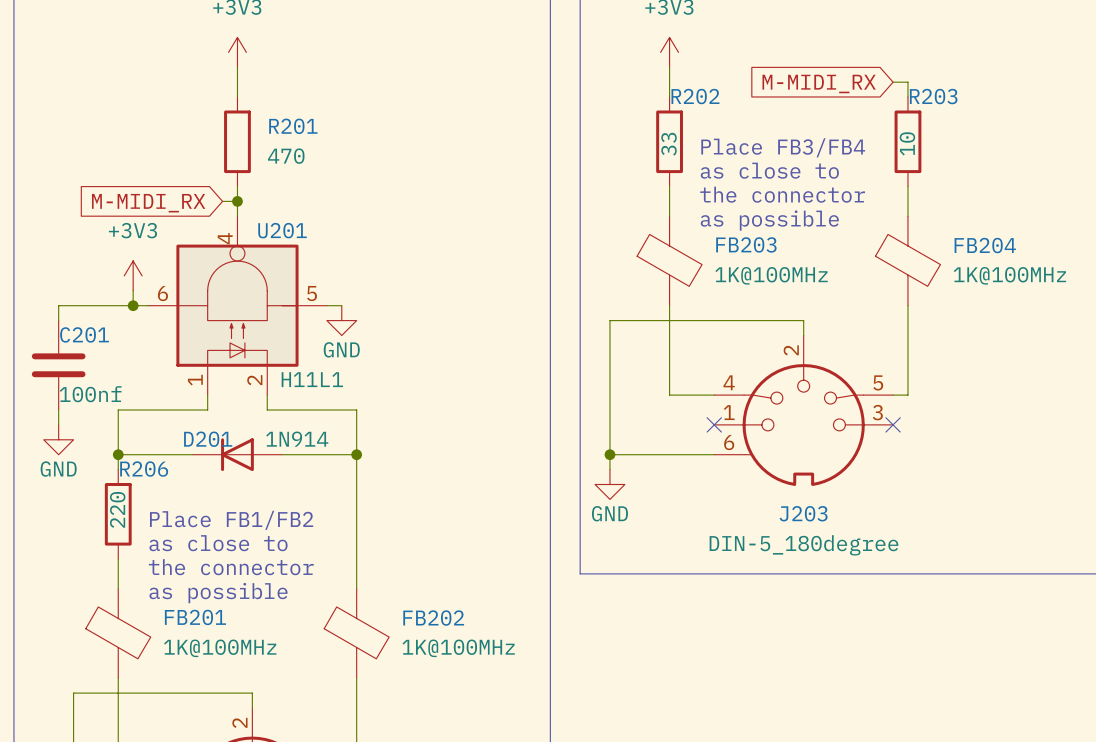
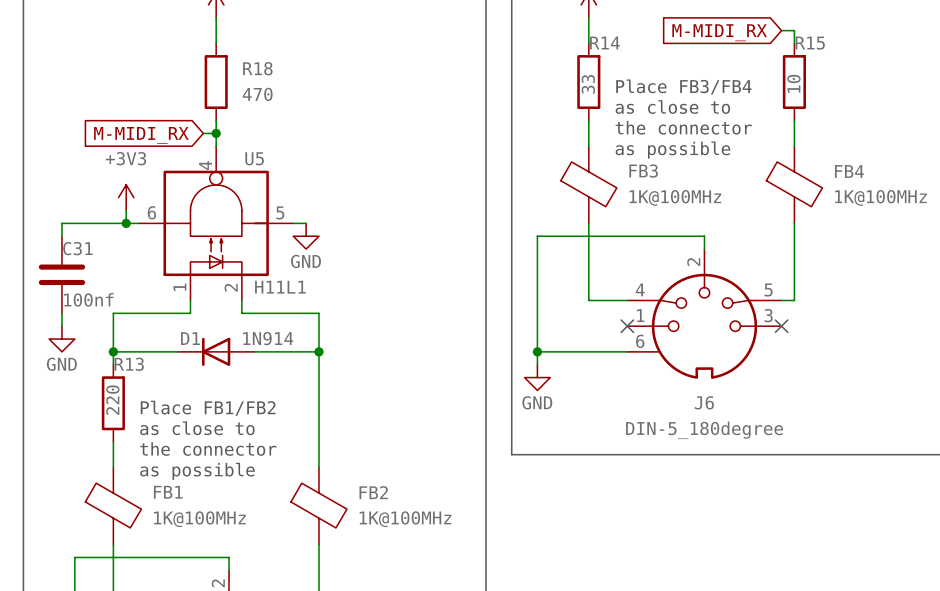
R202 name: R202 (695, 96) -> R14 (604, 43)
R203 name: R203 (933, 96) -> R15 (810, 43)
R201 name: R201 (293, 126) -> R18 (257, 68)
U201 name: U201 (282, 230) -> U5 (254, 158)
FB203 name: FB203 (746, 244) -> FB3 (643, 171)
FB204 name: FB204 (985, 245) -> FB4 (849, 171)
C201 name: C201 (84, 334) -> C31 (77, 248)
D201 name: D201 (208, 439) -> D1 (190, 338)
R206 name: R206 (144, 469) -> R13 (129, 364)
J203 name: J203 (803, 513) -> J6 (704, 402)
FB201 name: FB201 (195, 617) -> FB1 (168, 492)
FB202 name: FB202 (433, 618) -> FB2 (373, 492)

